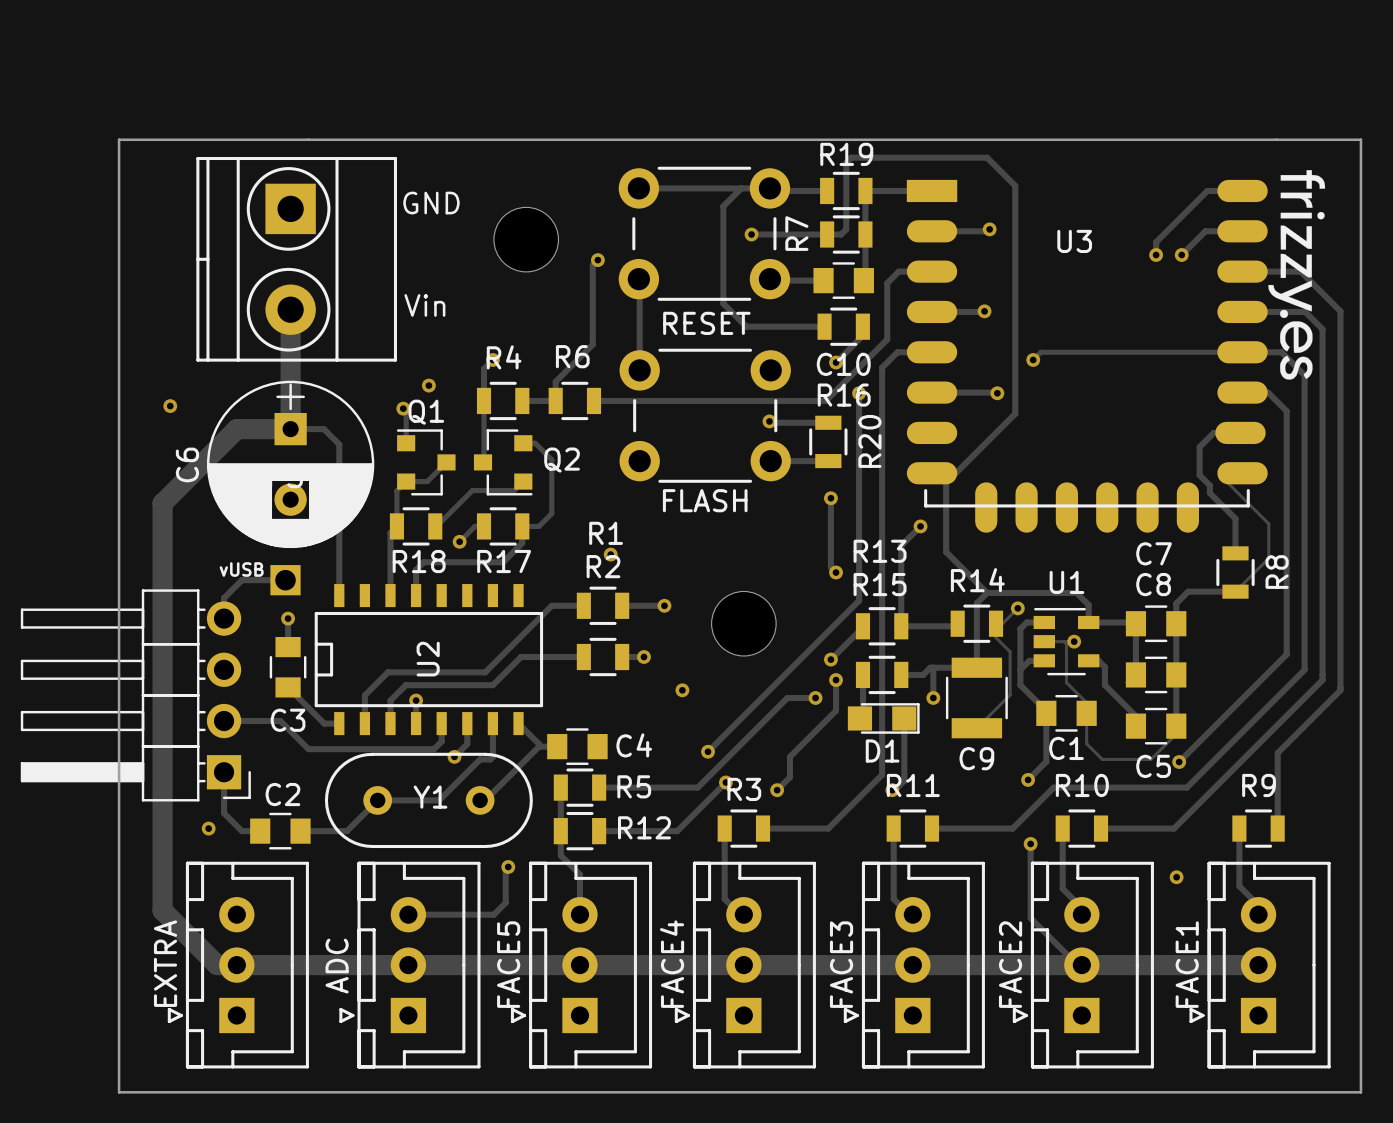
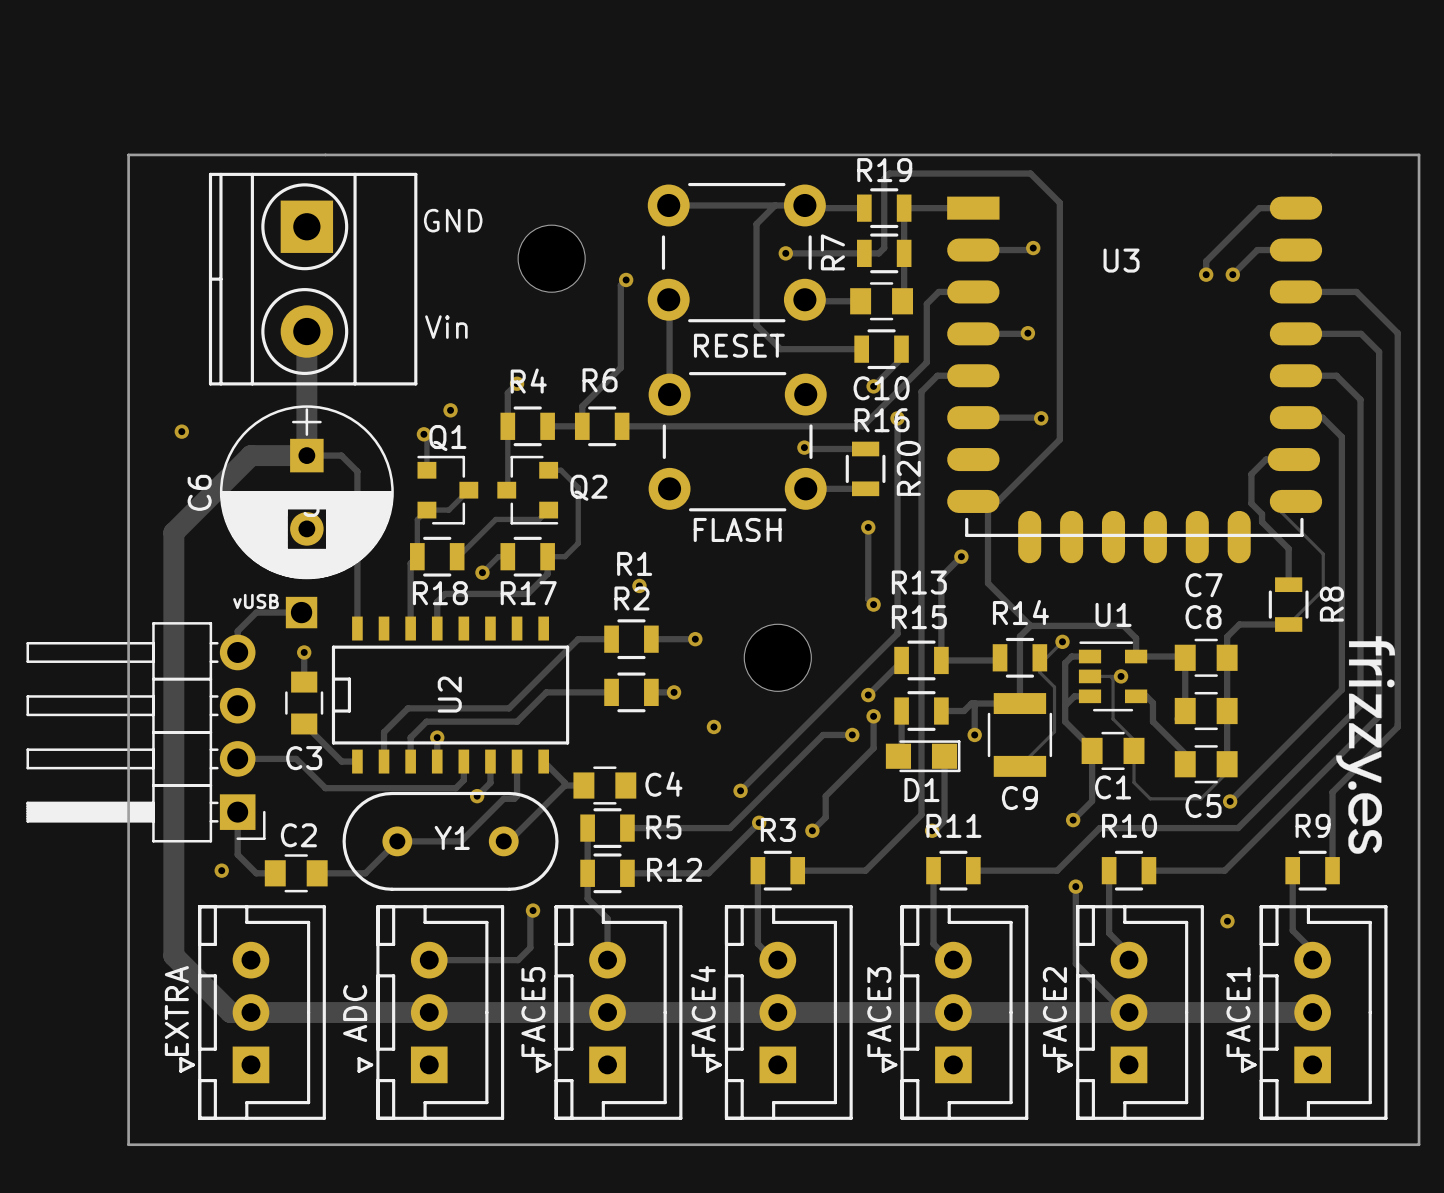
drawing position: (1296, 274) -> (1365, 744)
track: (1228, 352) (1040, 352) (1033, 359) -> none
via: (1033, 359) -> none

